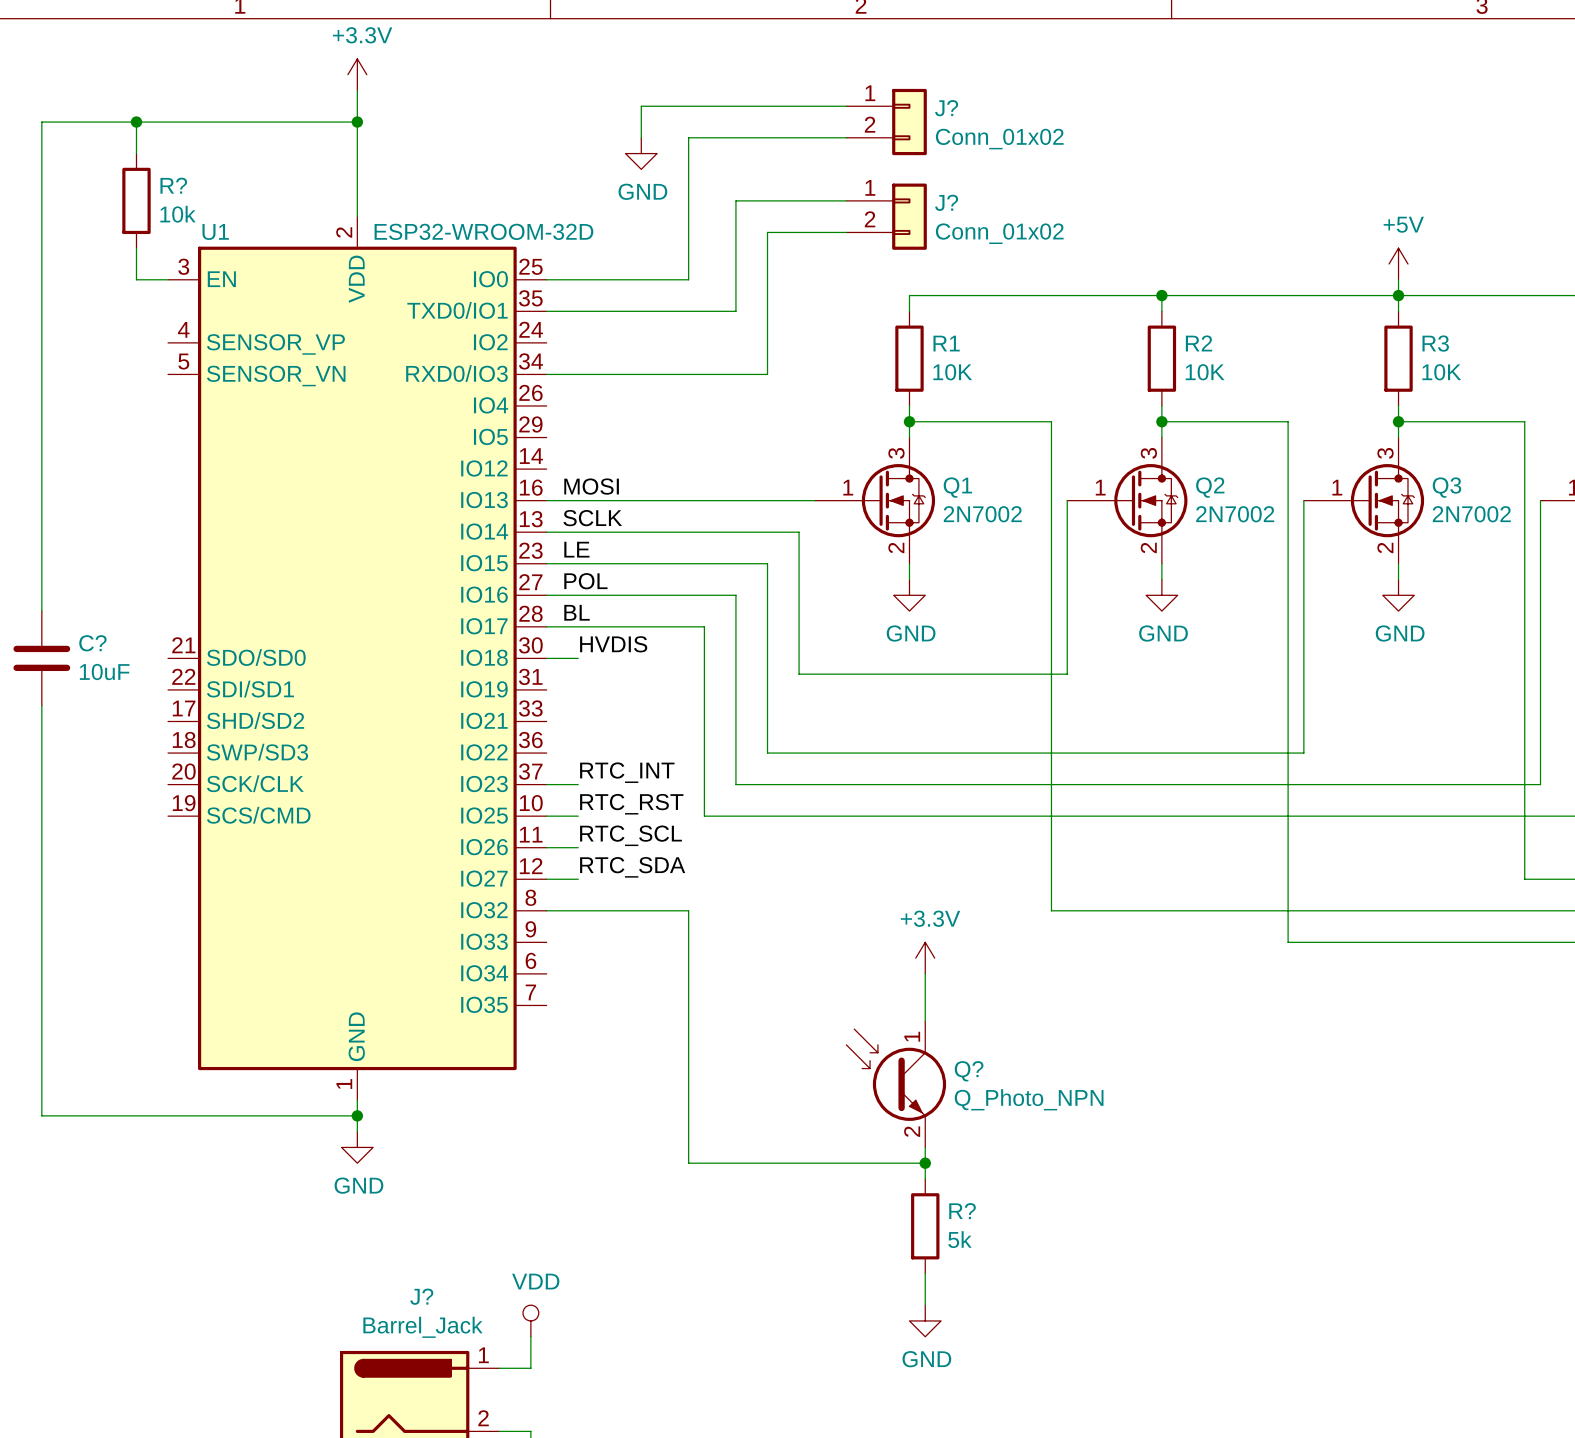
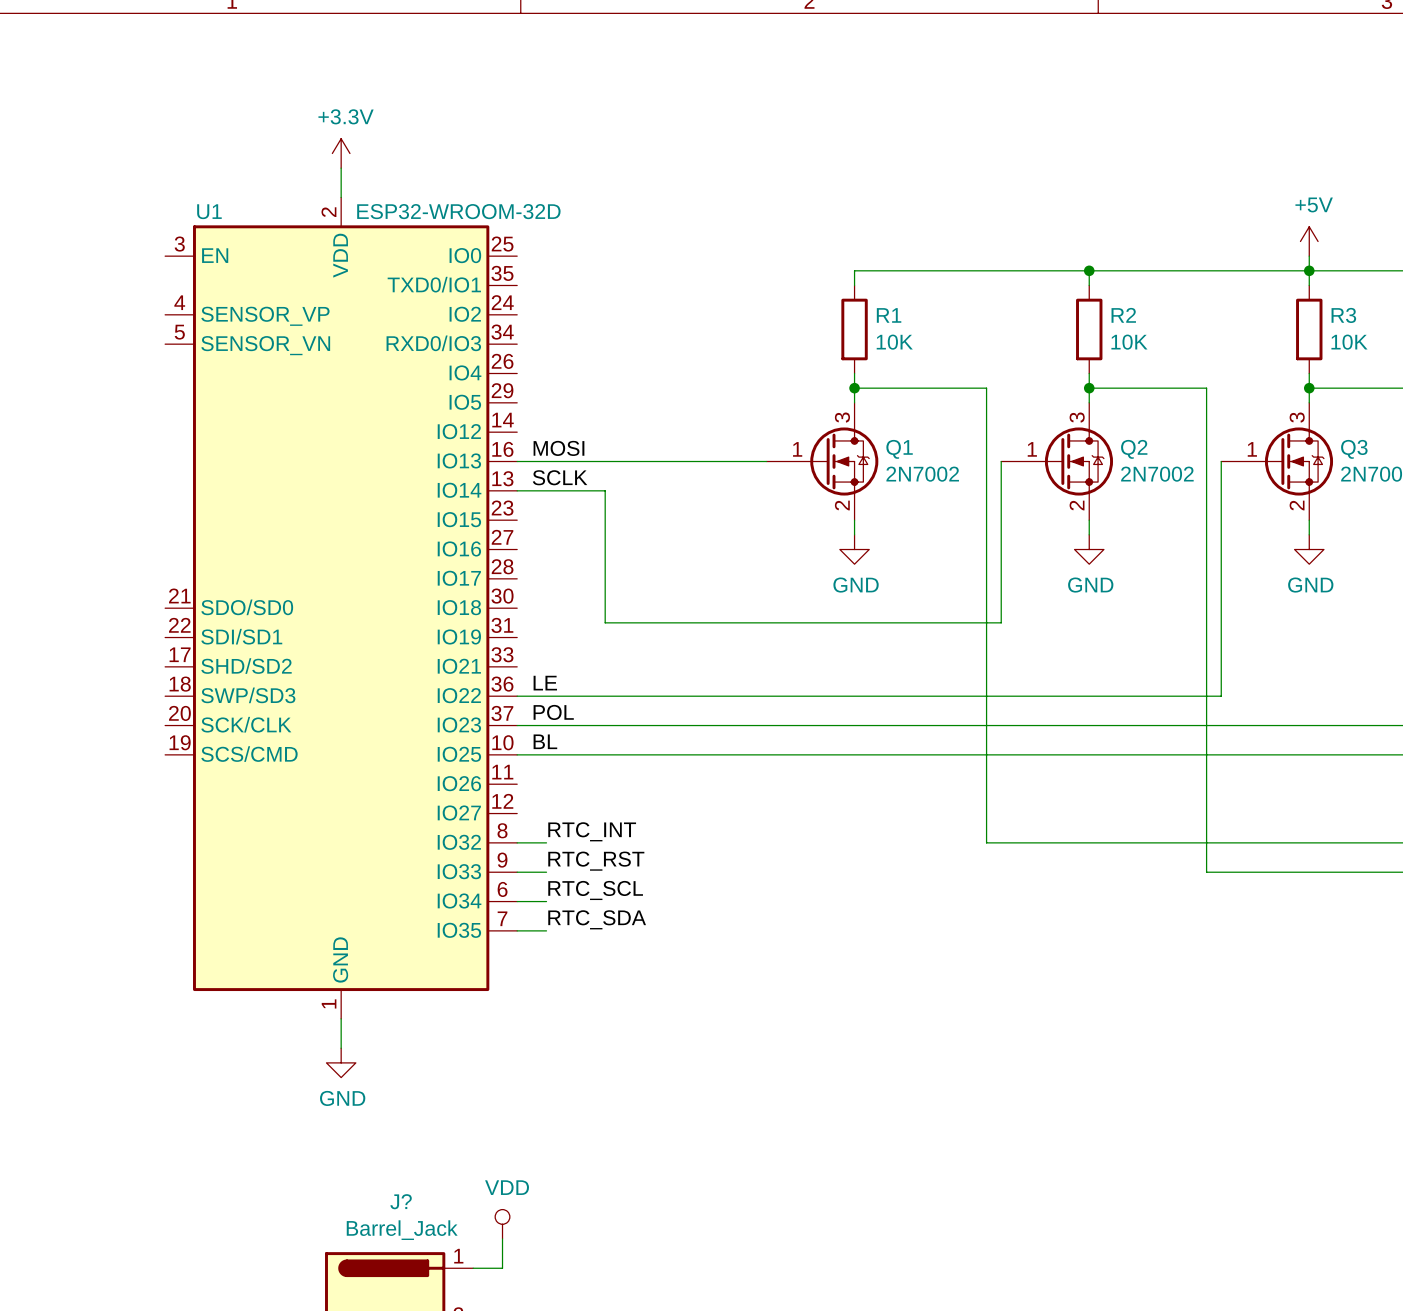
power symbol position: +3.3V (357, 74) -> +3.3V (341, 153)
wire: (357, 90) (357, 185) -> none
wire: (846, 106) (641, 106) (641, 137) -> none
wire: (136, 122) (136, 153) -> none
junction: (136, 122) -> none
wire: (357, 122) (41, 122) (41, 611) -> none
junction: (357, 122) -> none
J?: Conn_01x02 (886, 122) -> none
wire: (846, 137) (688, 137) (688, 279) (546, 279) -> none
power symbol: GND (641, 153) -> none
R?: 10k (136, 200) -> none
wire: (846, 200) (735, 200) (735, 311) (546, 311) -> none
J?: Conn_01x02 (886, 216) -> none
wire: (846, 232) (767, 232) (767, 374) (546, 374) -> none
wire: (136, 248) (136, 279) (168, 279) -> none
wire: (641, 532) (799, 532) (799, 674) -> (605, 490) (605, 622) (751, 622)
label position: LE (576, 549) -> LE (545, 683)
wire: (546, 563) (767, 563) (767, 753) -> (517, 696) (722, 696)
label position: POL (585, 581) -> POL (553, 712)
wire: (546, 595) (735, 595) (735, 784) -> (546, 725) (693, 725)
label position: BL (577, 612) -> BL (545, 741)
wire: (546, 626) (704, 626) (704, 816) -> (546, 754) (663, 754)
label: HVDIS (613, 644) -> none
C?: 10uF (41, 658) -> none
wire: (546, 658) (578, 658) -> none
wire: (41, 705) (41, 1115) (357, 1115) -> none
label position: RTC_INT (627, 772) -> RTC_INT (592, 831)
label position: RTC_RST (631, 804) -> RTC_RST (596, 861)
label position: RTC_SCL (631, 835) -> RTC_SCL (595, 890)
wire: (546, 847) (578, 847) -> (517, 872) (546, 872)
label position: RTC_SDA (632, 867) -> RTC_SDA (597, 919)
wire: (546, 879) (578, 879) -> (517, 901) (546, 901)
wire: (578, 910) (688, 910) (688, 1163) (925, 1163) -> none
power symbol: +3.3V (925, 958) -> none
wire: (925, 973) (925, 1021) -> none
wire: none -> (517, 930) (546, 930)
Q?: Q_Photo_NPN (896, 1084) -> none
junction: (357, 1115) -> none
wire: (925, 1147) (925, 1178) -> none
junction: (925, 1163) -> none
R?: 5k (925, 1226) -> none
wire: (925, 1273) (925, 1305) -> none
power symbol: GND (925, 1320) -> none

